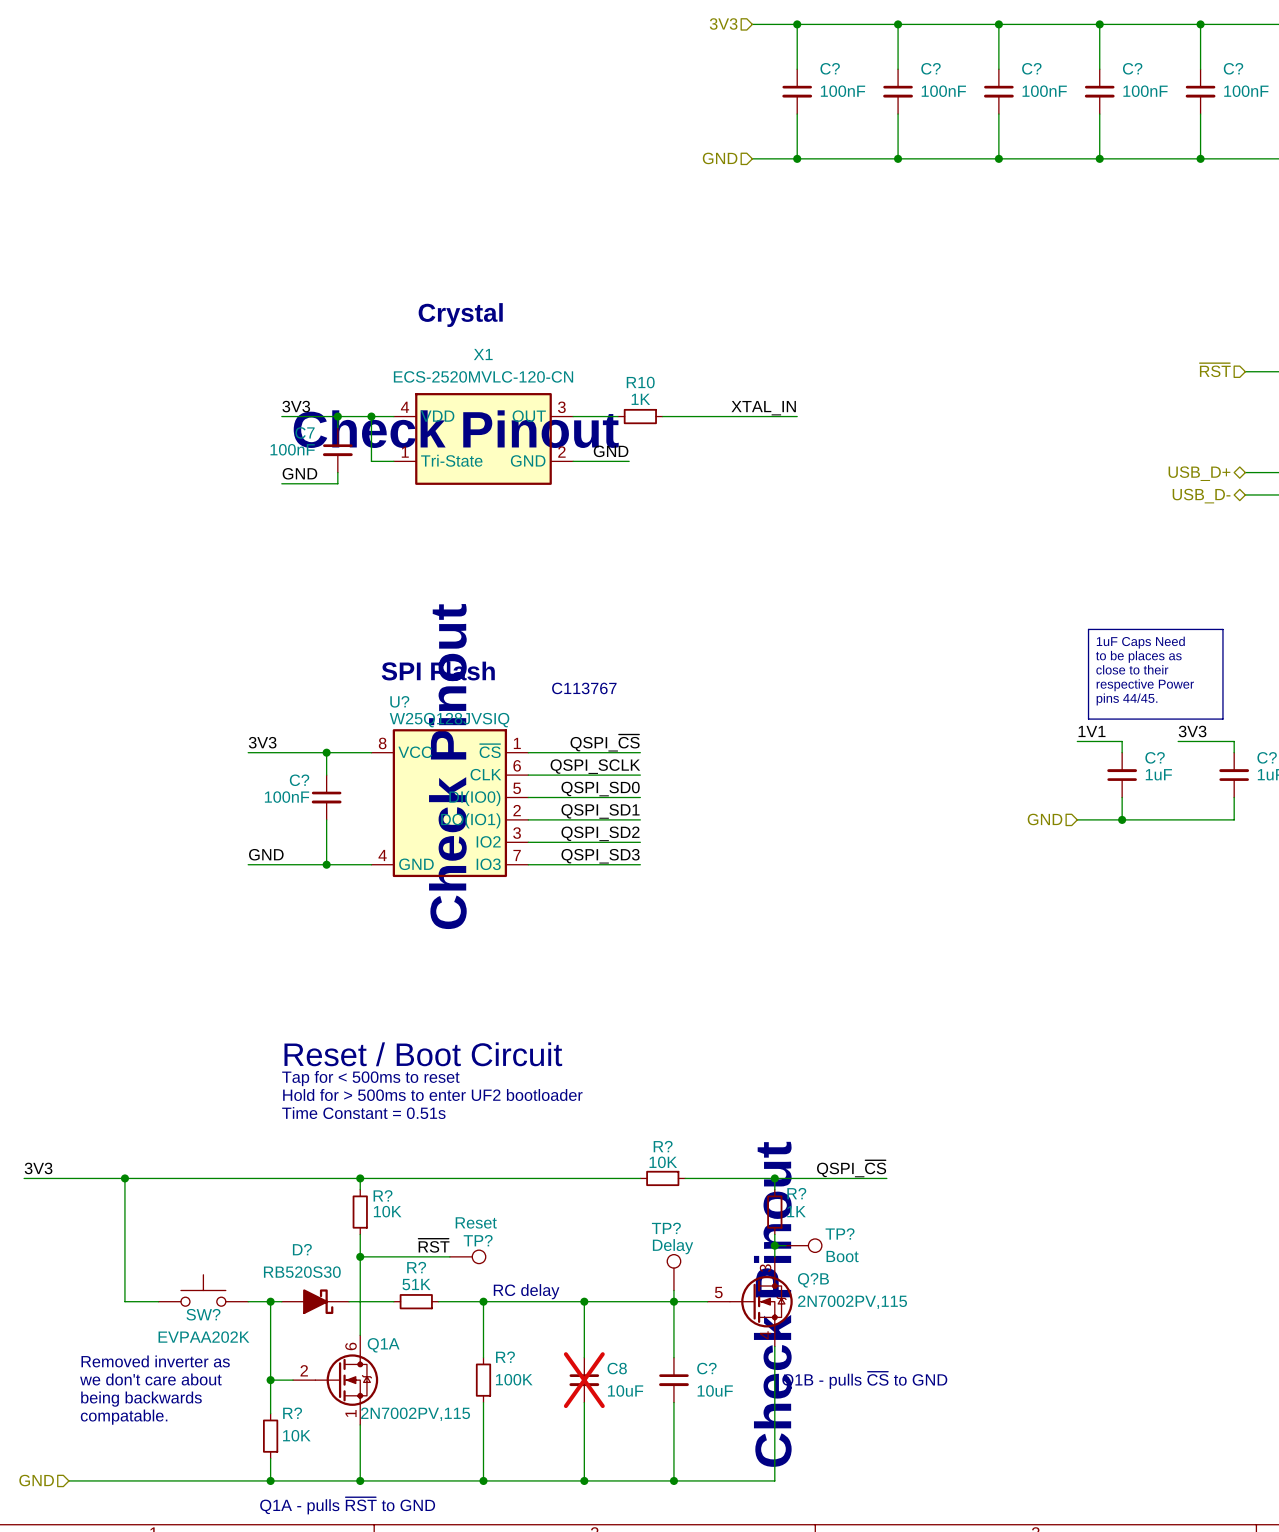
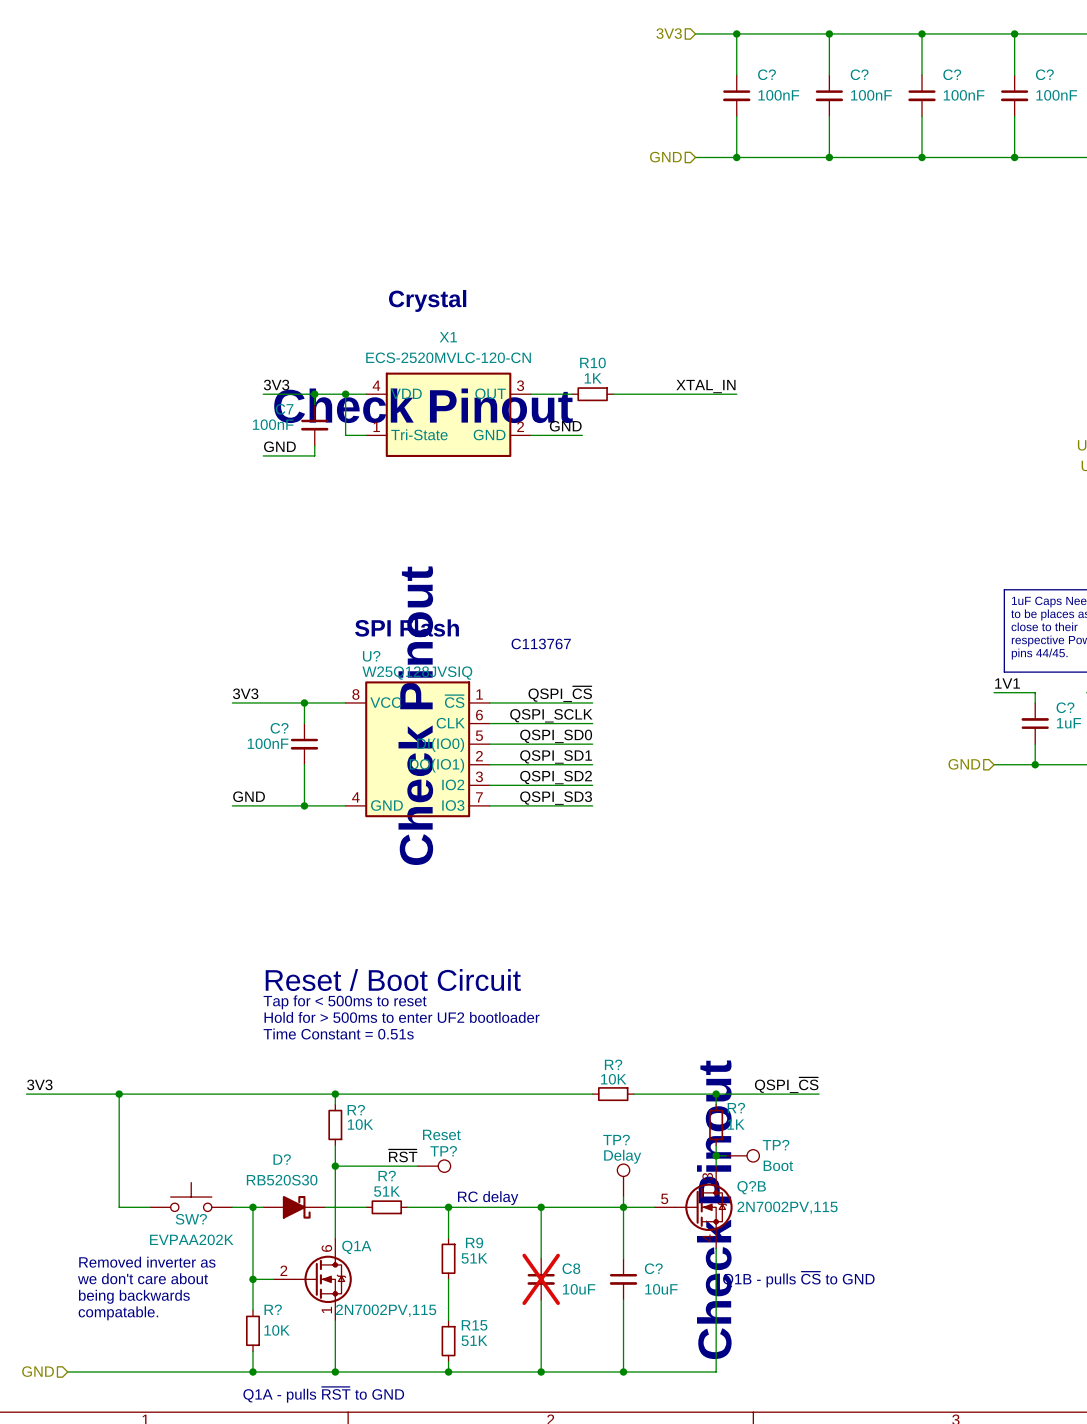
wire: (483, 1335) (483, 1357) -> (448, 1279) (448, 1299)
R9: none -> 51K (448, 1258)
R?: 100K (483, 1380) -> none
wire: (483, 1424) (483, 1469) -> none
R15: none -> 51K (448, 1341)

